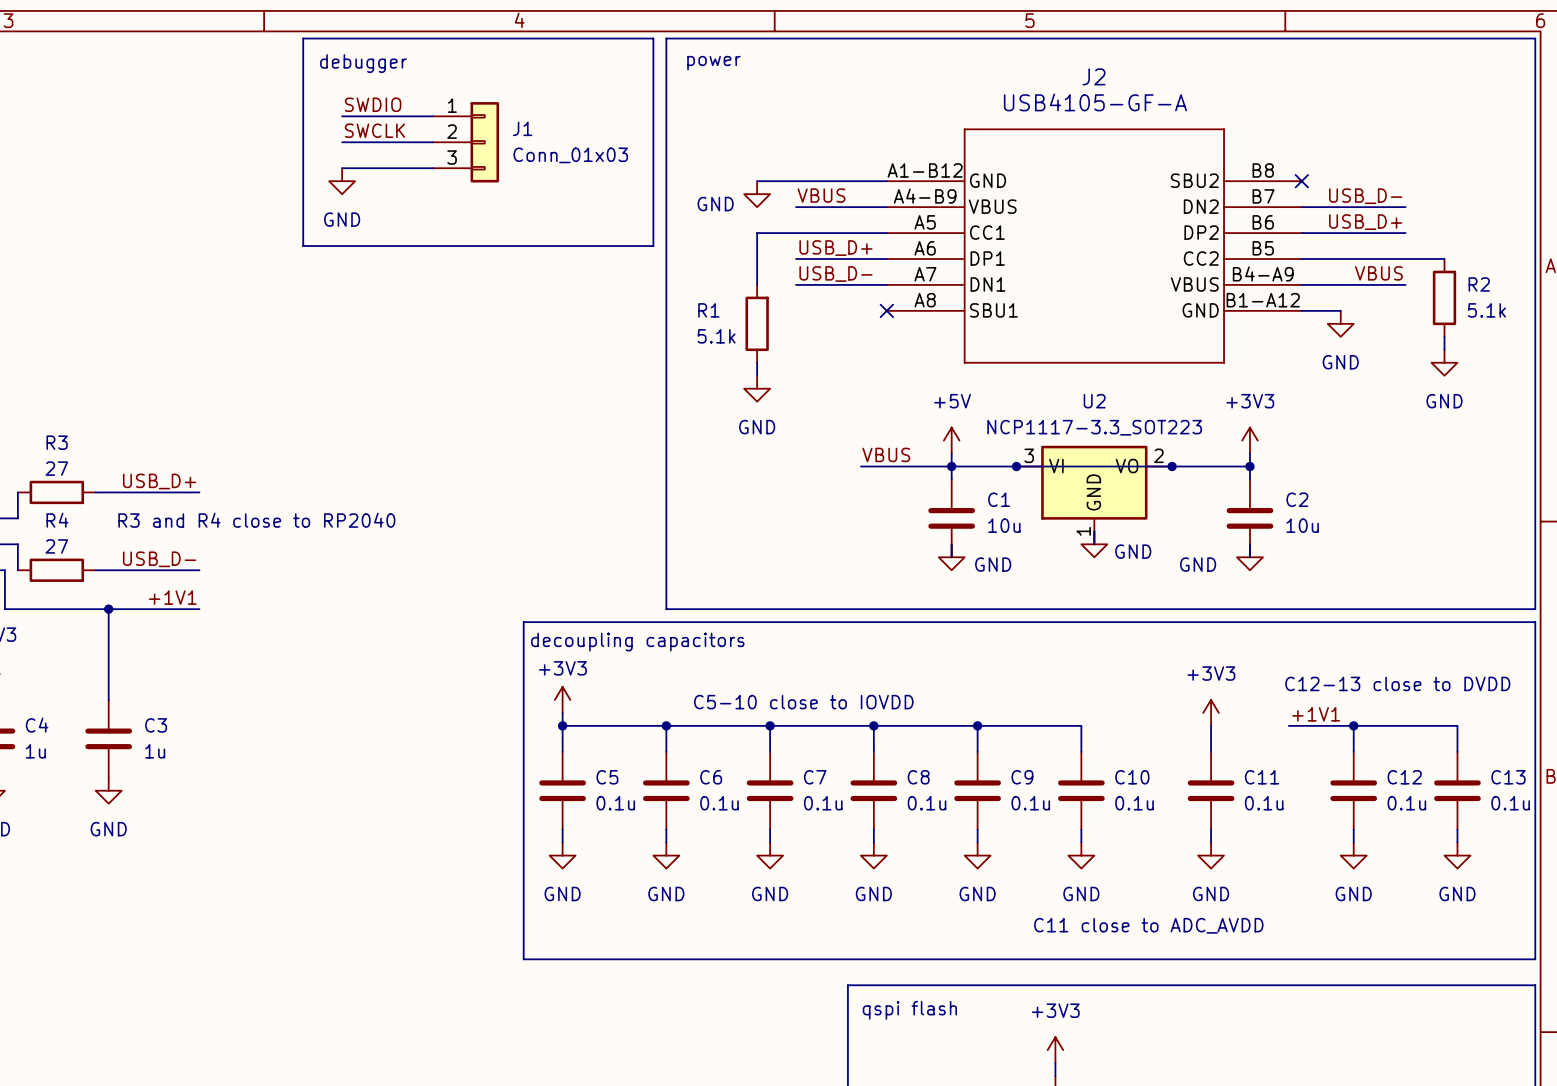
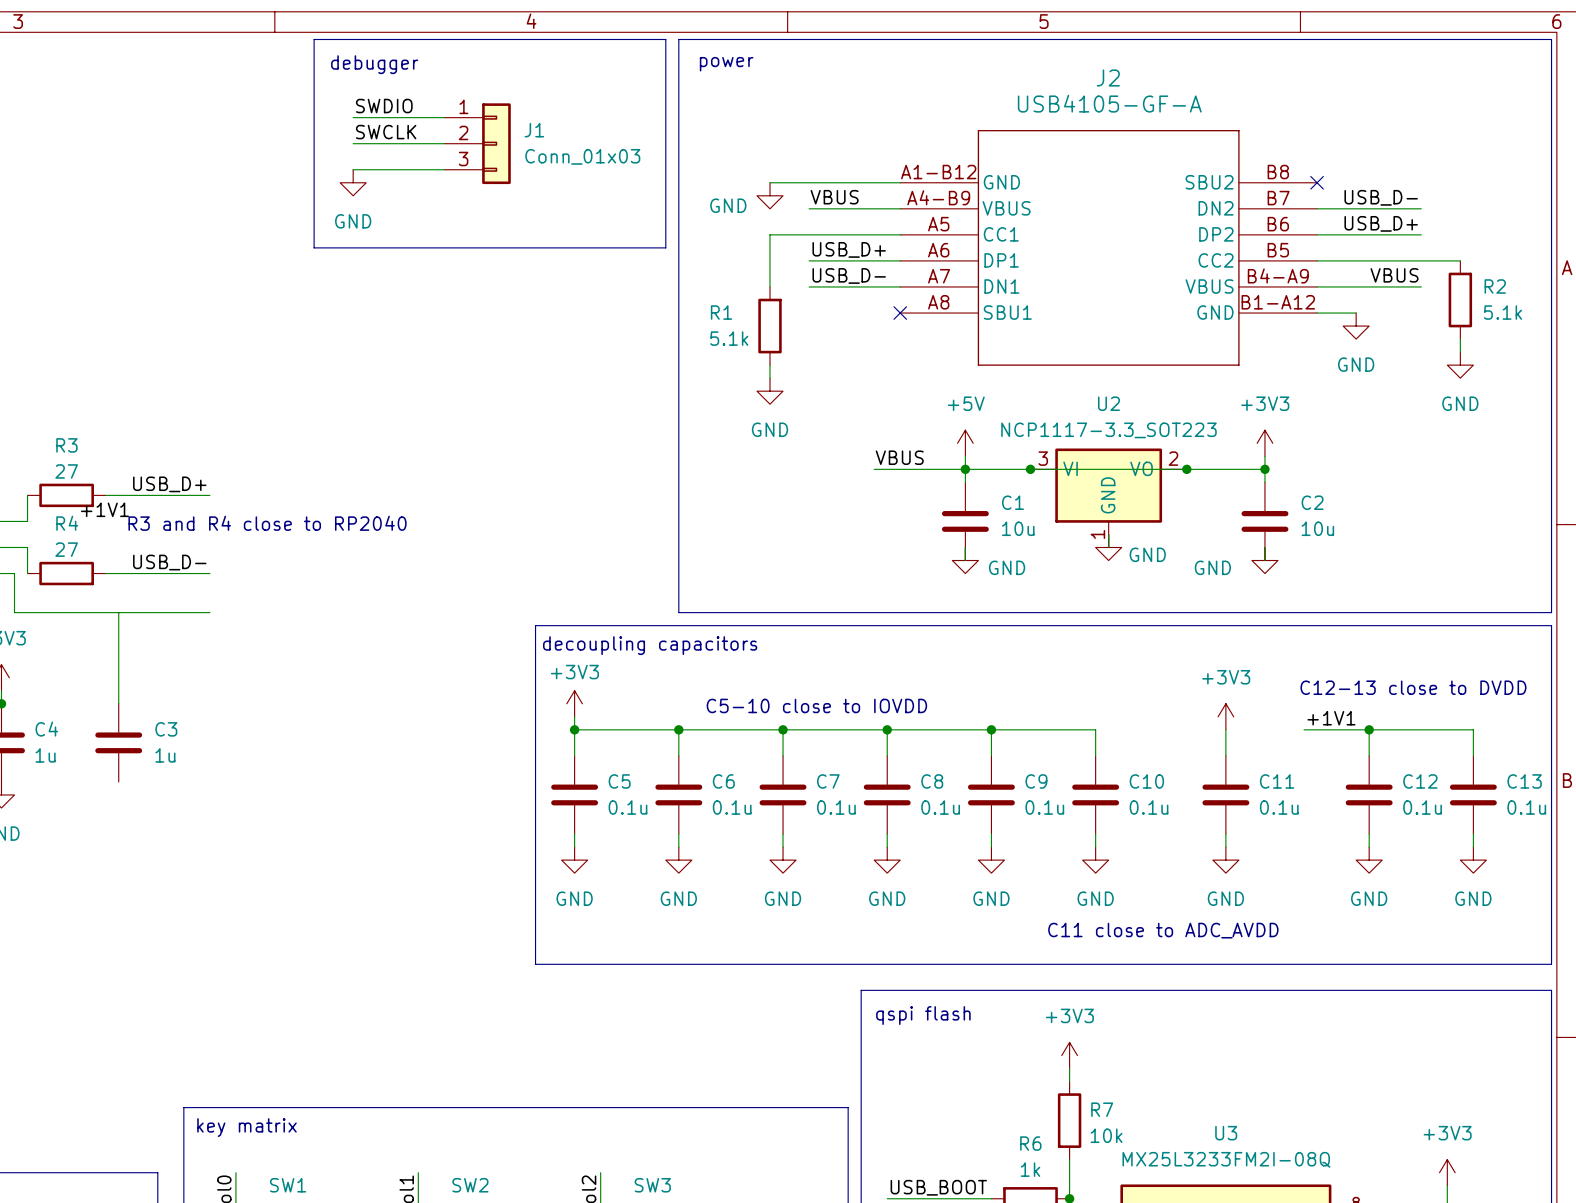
label position: +1V1 (172, 597) -> +1V1 (104, 509)
junction: (108, 609) -> none
power symbol: GND (108, 790) -> none

